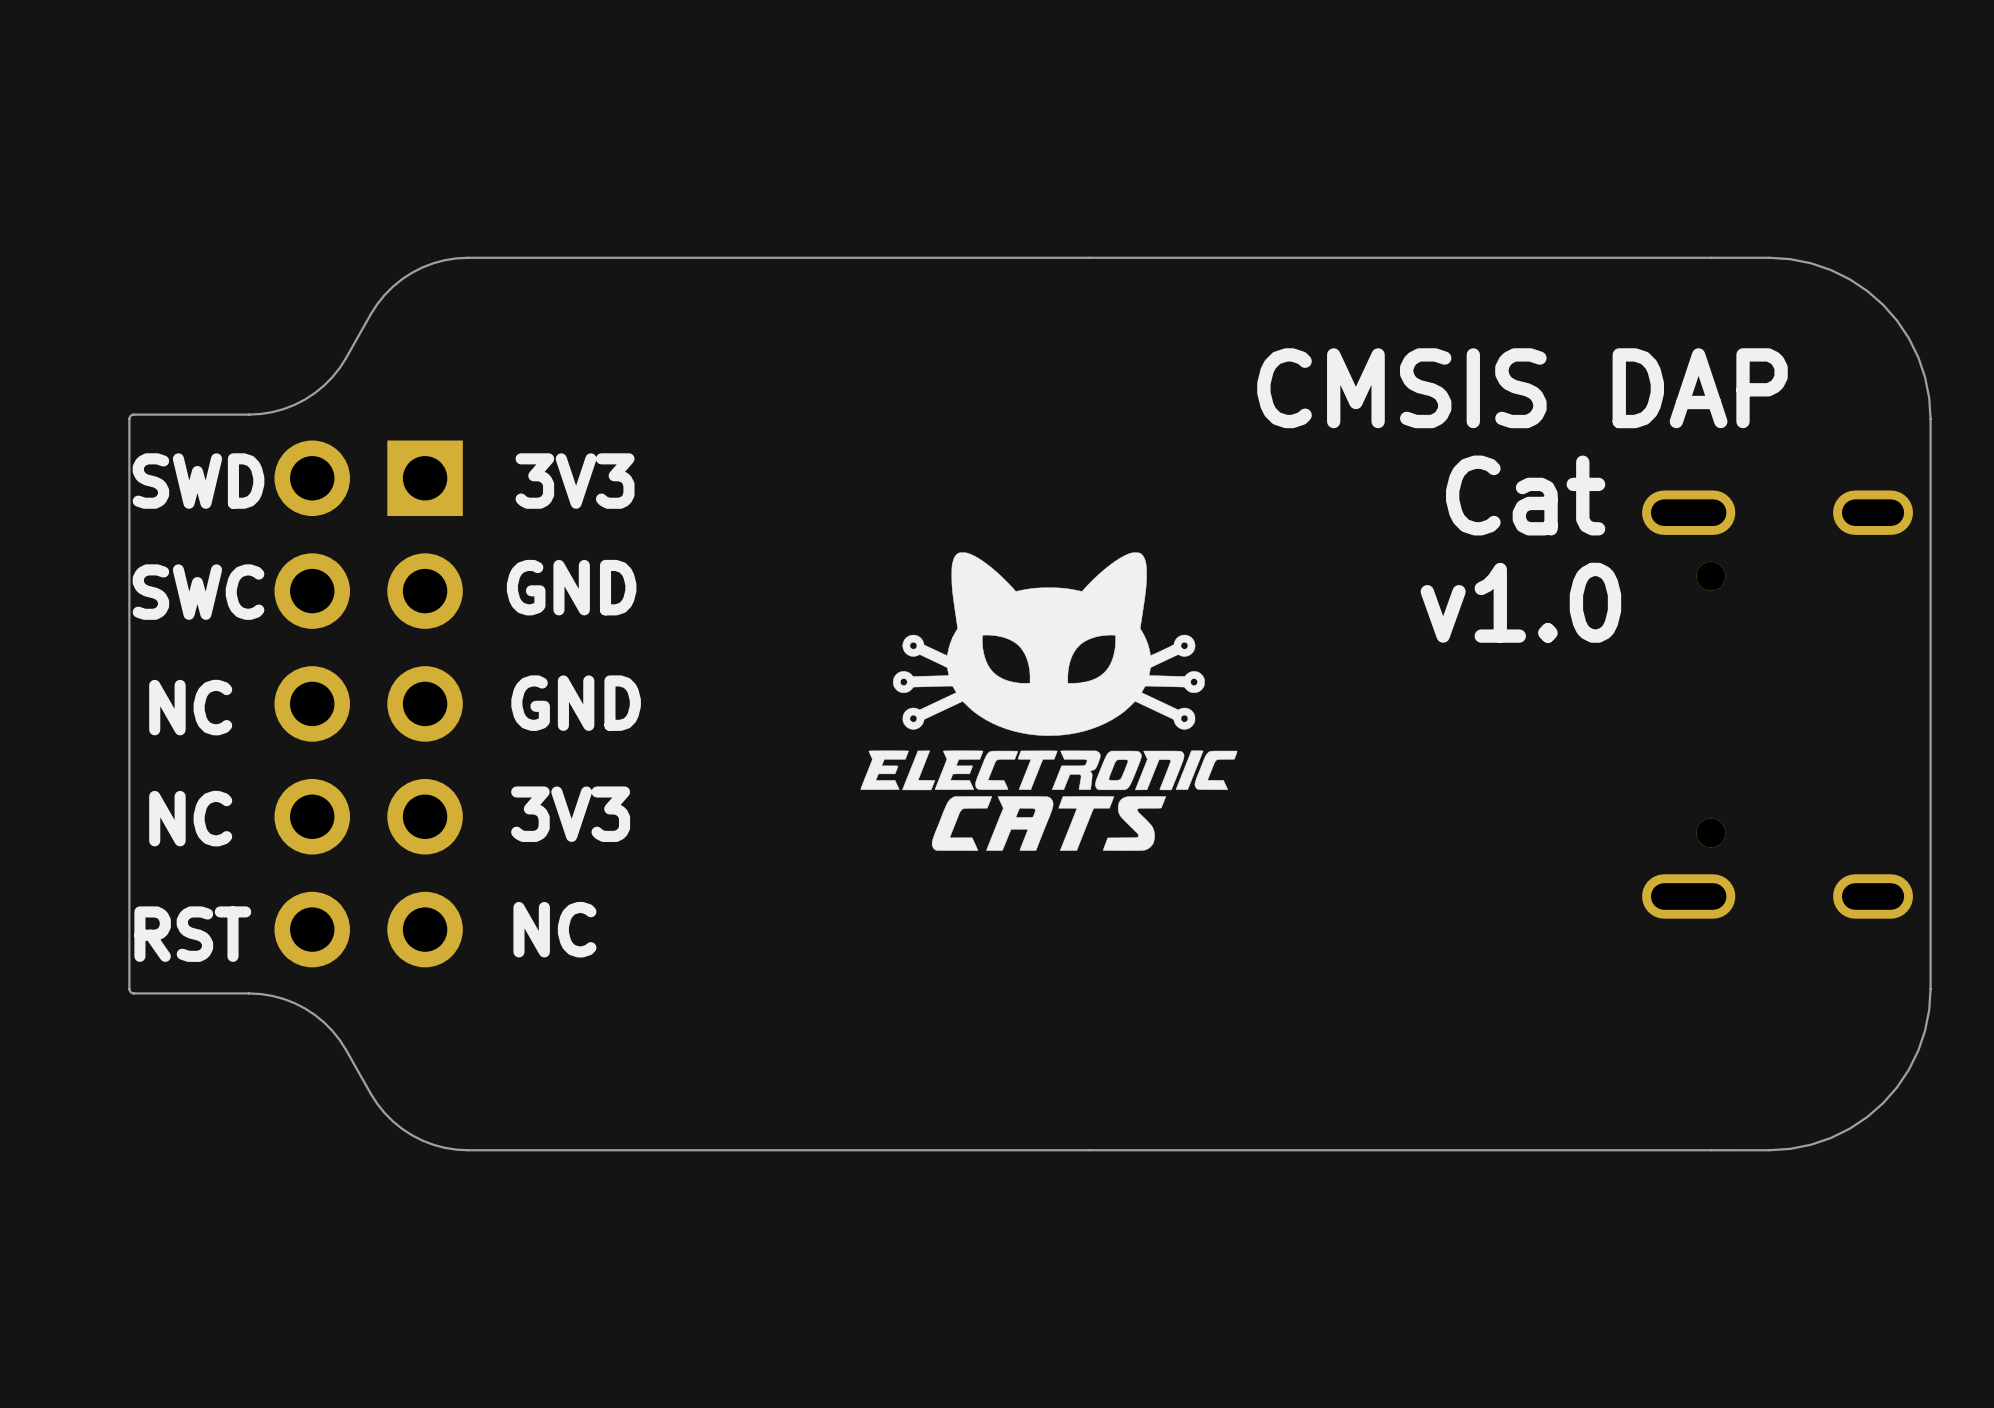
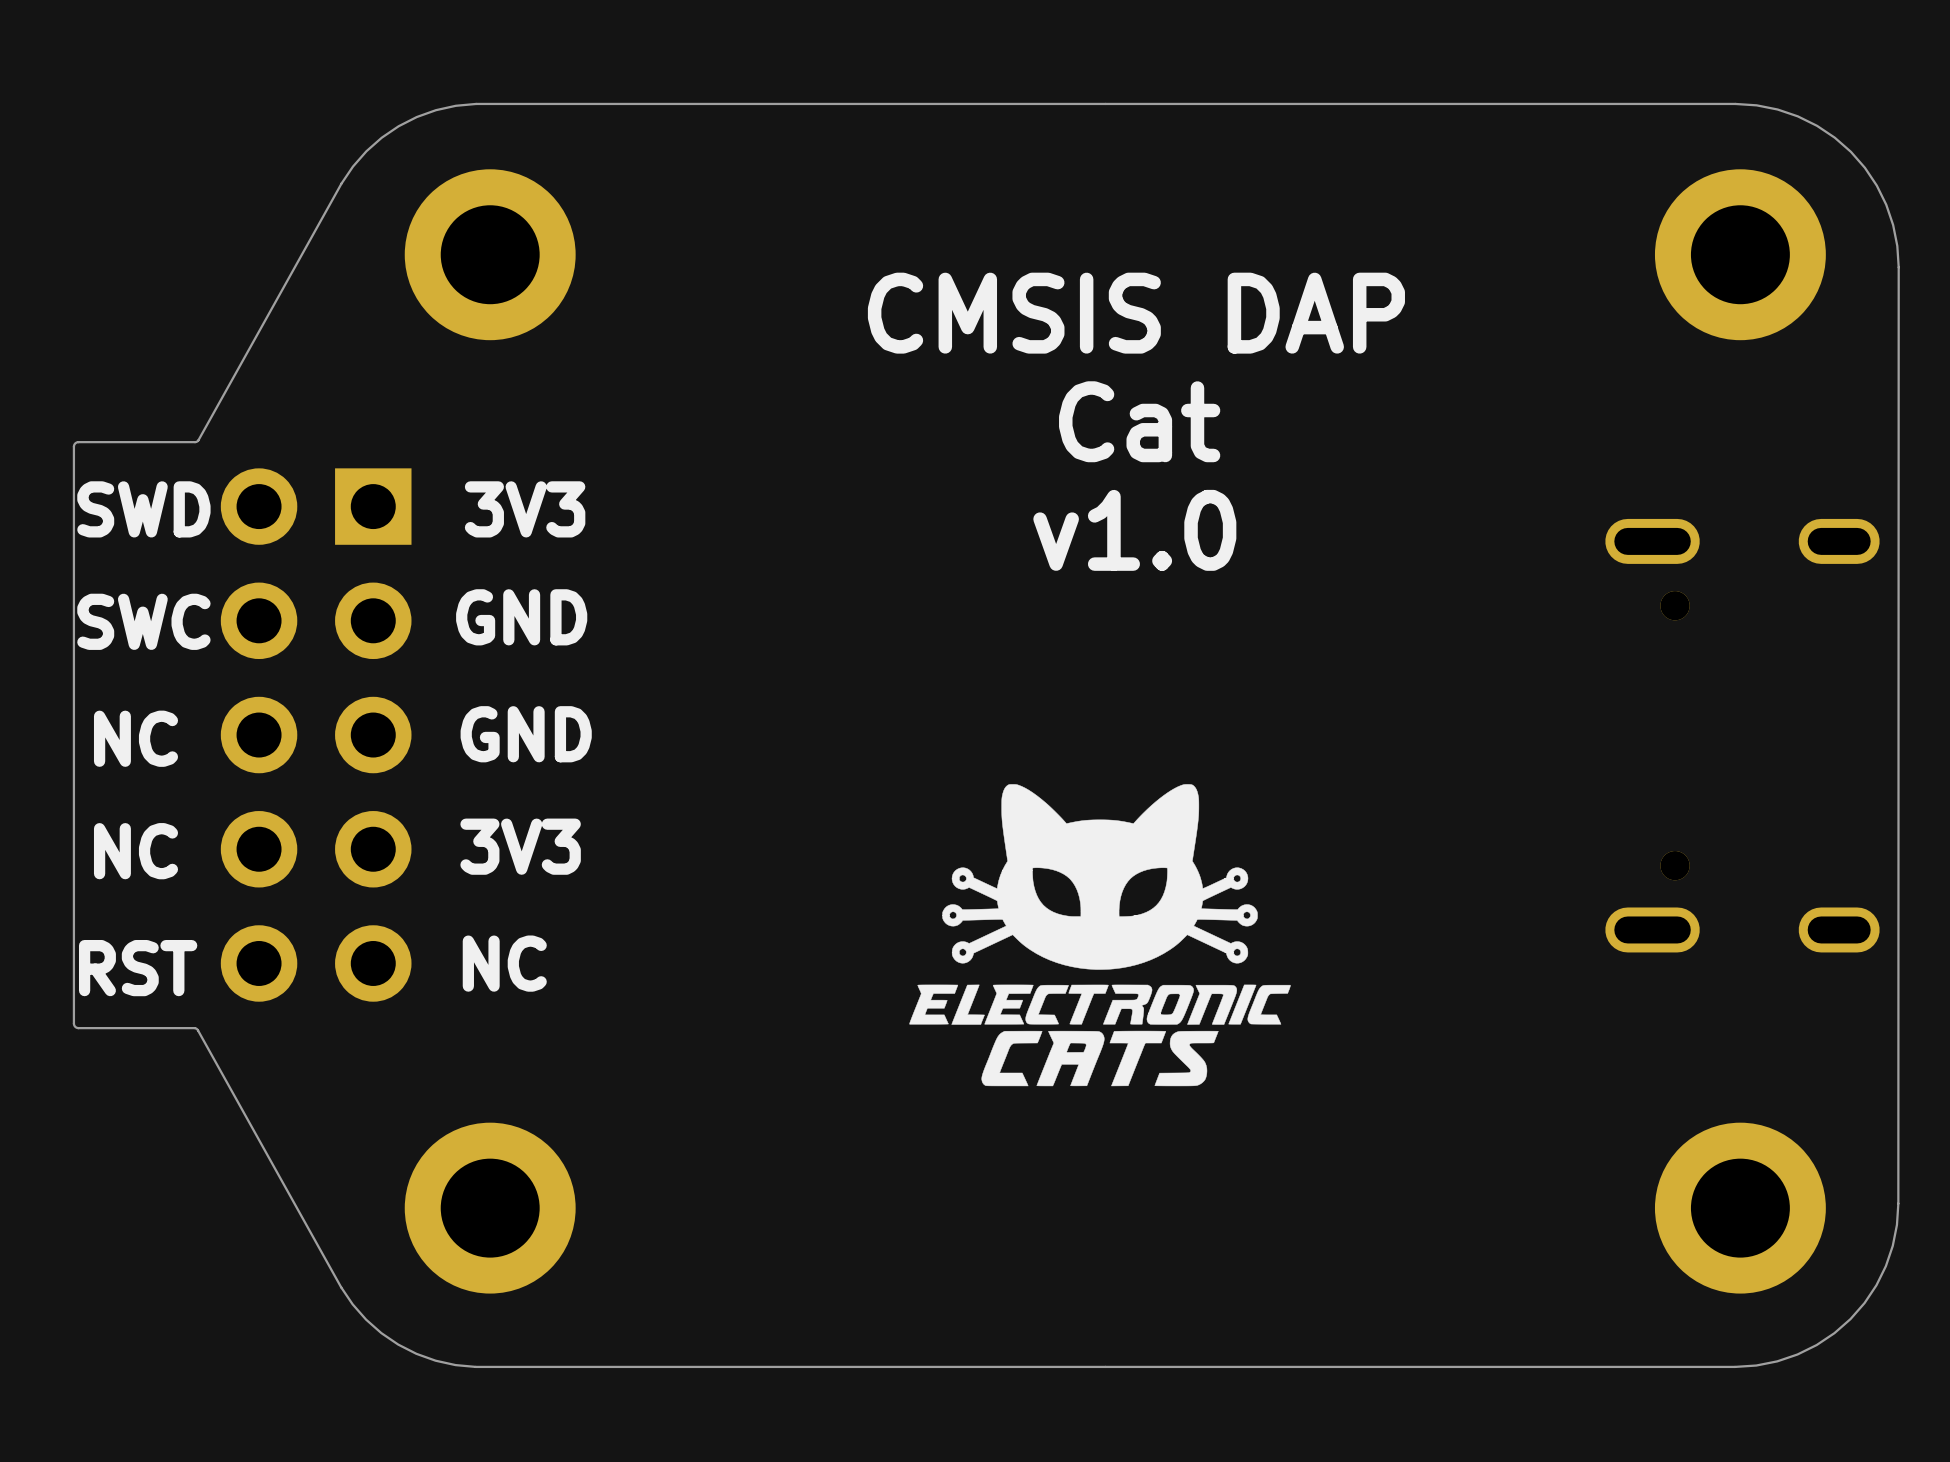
part: none -> (490, 254)
part: none -> (1740, 254)
text position: CMSIS DAP (1522, 388) -> CMSIS DAP (1136, 313)
board edge: (248, 414) (283, 409) (314, 393) (339, 368) (377, 304) (392, 286) (422, 267) (456, 258) (1769, 257) (1811, 263) (1830, 270) (1849, 279) (1883, 305) (1908, 338) (1918, 357) (1929, 398) (1930, 419) (1929, 1009) (1918, 1050) (1897, 1087) (1867, 1116) (1830, 1137) (1811, 1144) (1769, 1150) (456, 1149) (422, 1140) (392, 1121) (377, 1103) (339, 1039) (314, 1014) (283, 998) (248, 993) -> (195, 442) (198, 440) (341, 183) (352, 166) (381, 137) (398, 126) (416, 117) (455, 105) (476, 103) (1756, 105) (1797, 116) (1817, 125) (1850, 151) (1876, 185) (1893, 225) (1897, 245) (1896, 1224) (1885, 1266) (1864, 1303) (1834, 1333) (1797, 1354) (1777, 1361) (1735, 1366) (475, 1366) (455, 1365) (435, 1360) (398, 1344) (381, 1333) (352, 1304) (341, 1287) (195, 1028)
text position: Cat (1525, 495) -> Cat (1139, 421)
text position: v1.0 (1520, 602) -> v1.0 (1134, 530)
drawing position: (1048, 701) -> (1100, 935)
part: none -> (490, 1208)
part: none -> (1740, 1208)

